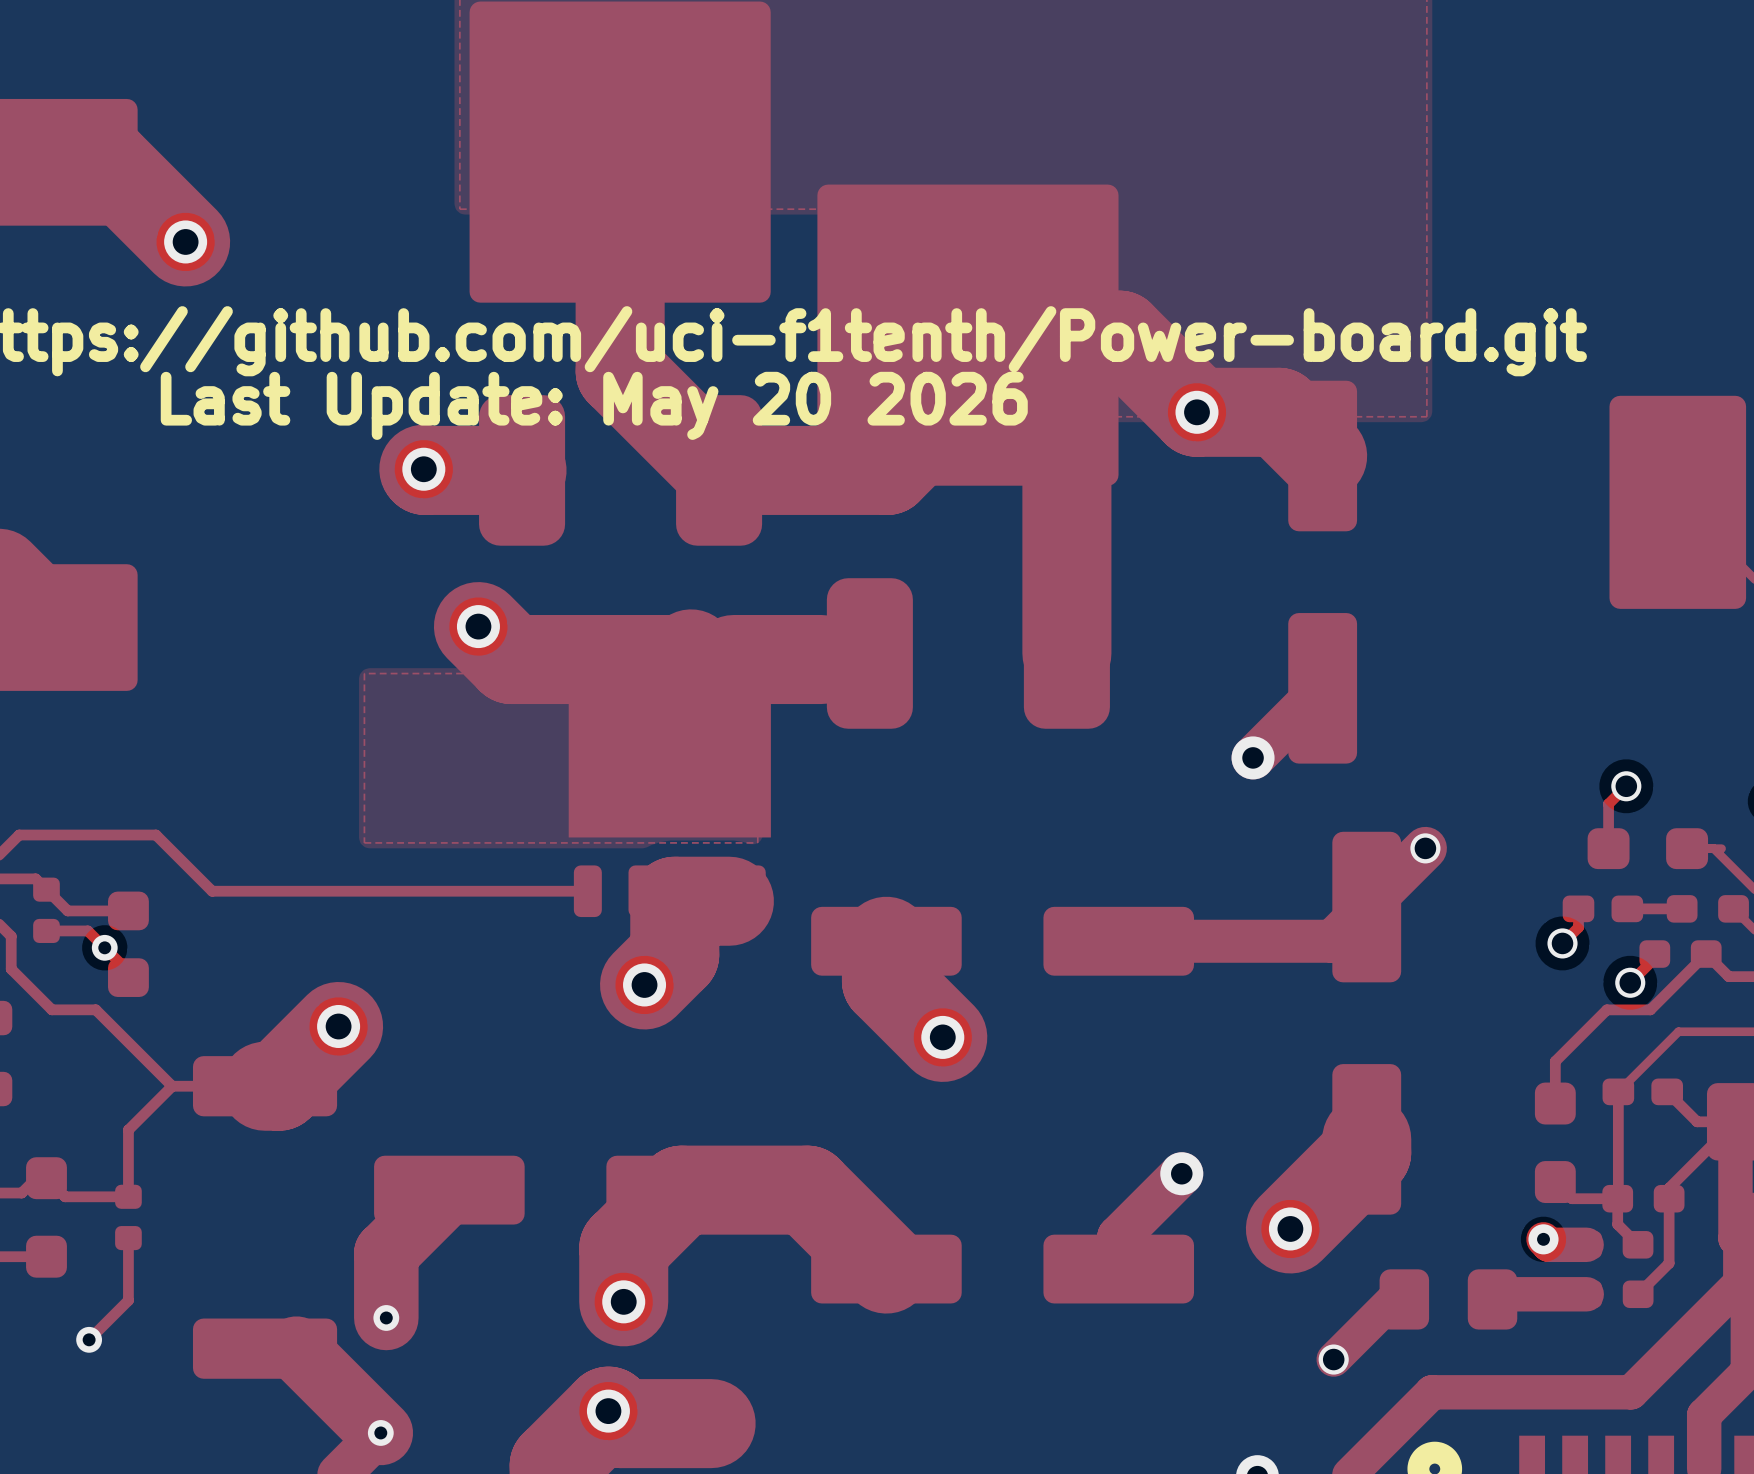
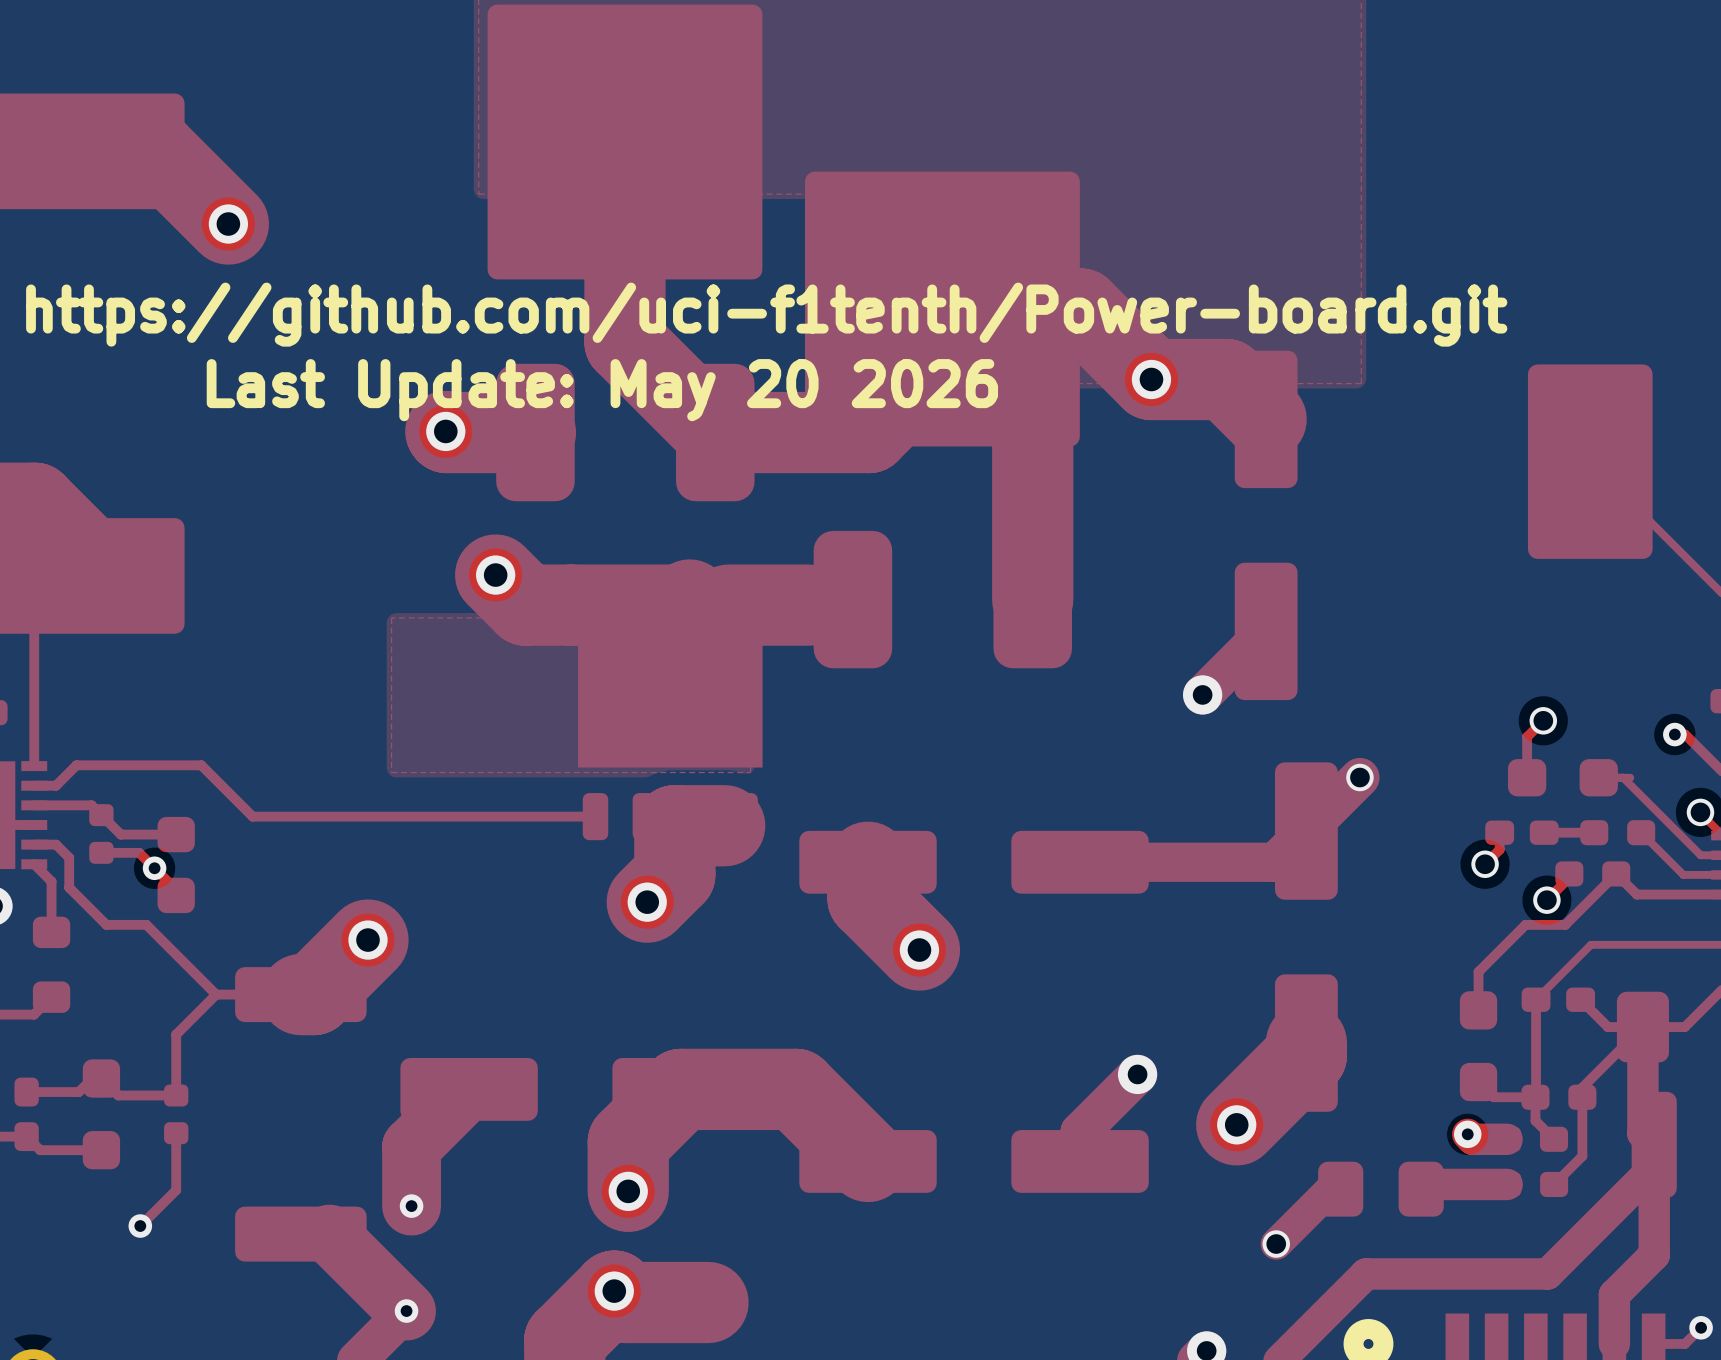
text position: Last Update: May 20 2026 (594, 405) -> Last Update: May 20 2026 (602, 390)

